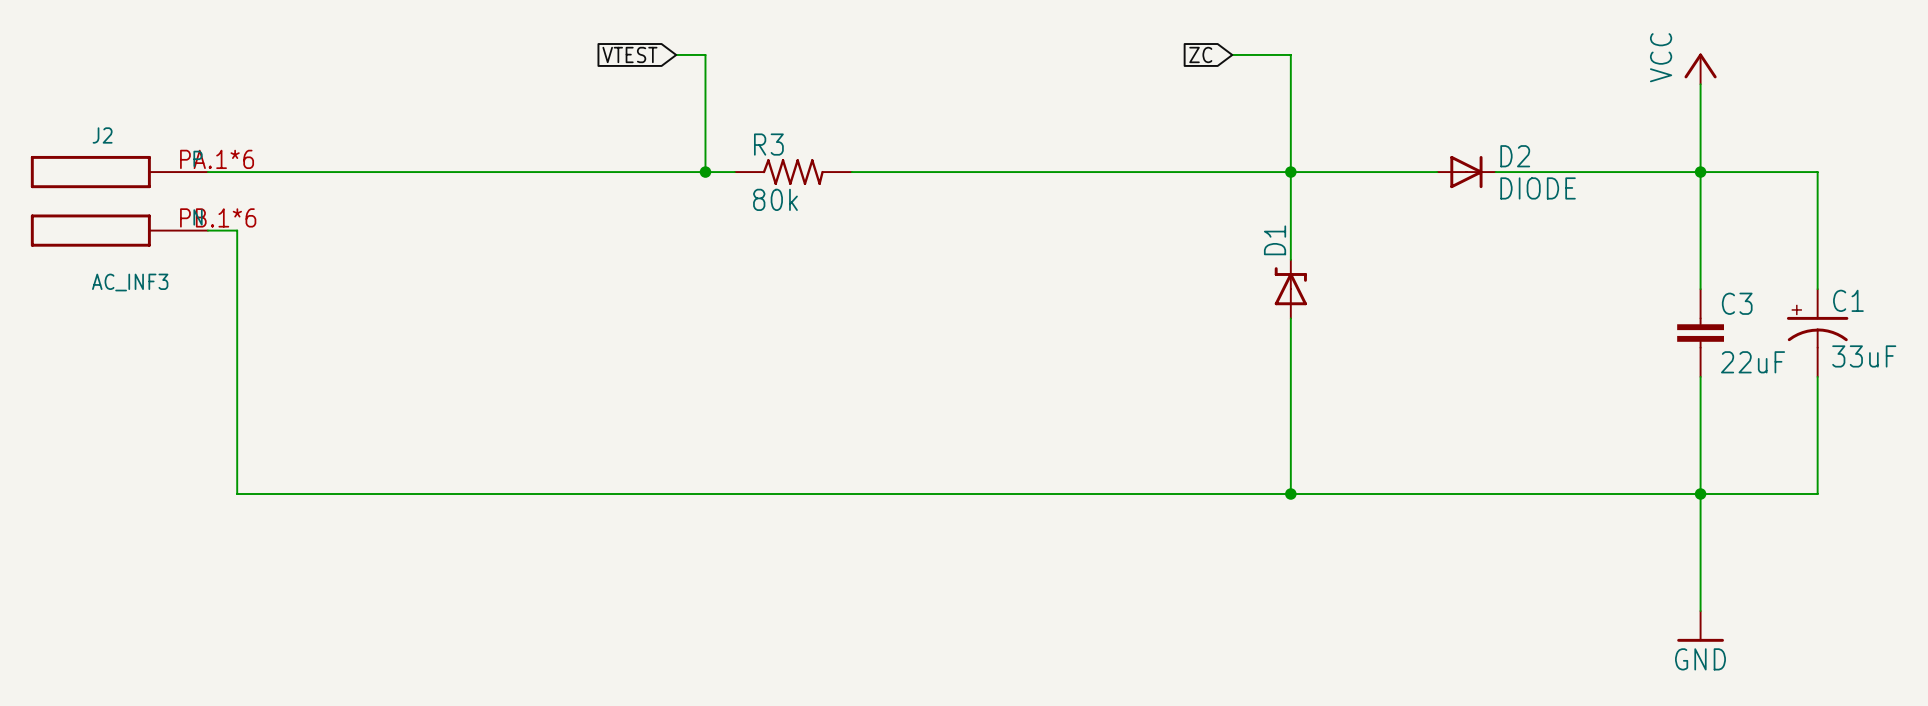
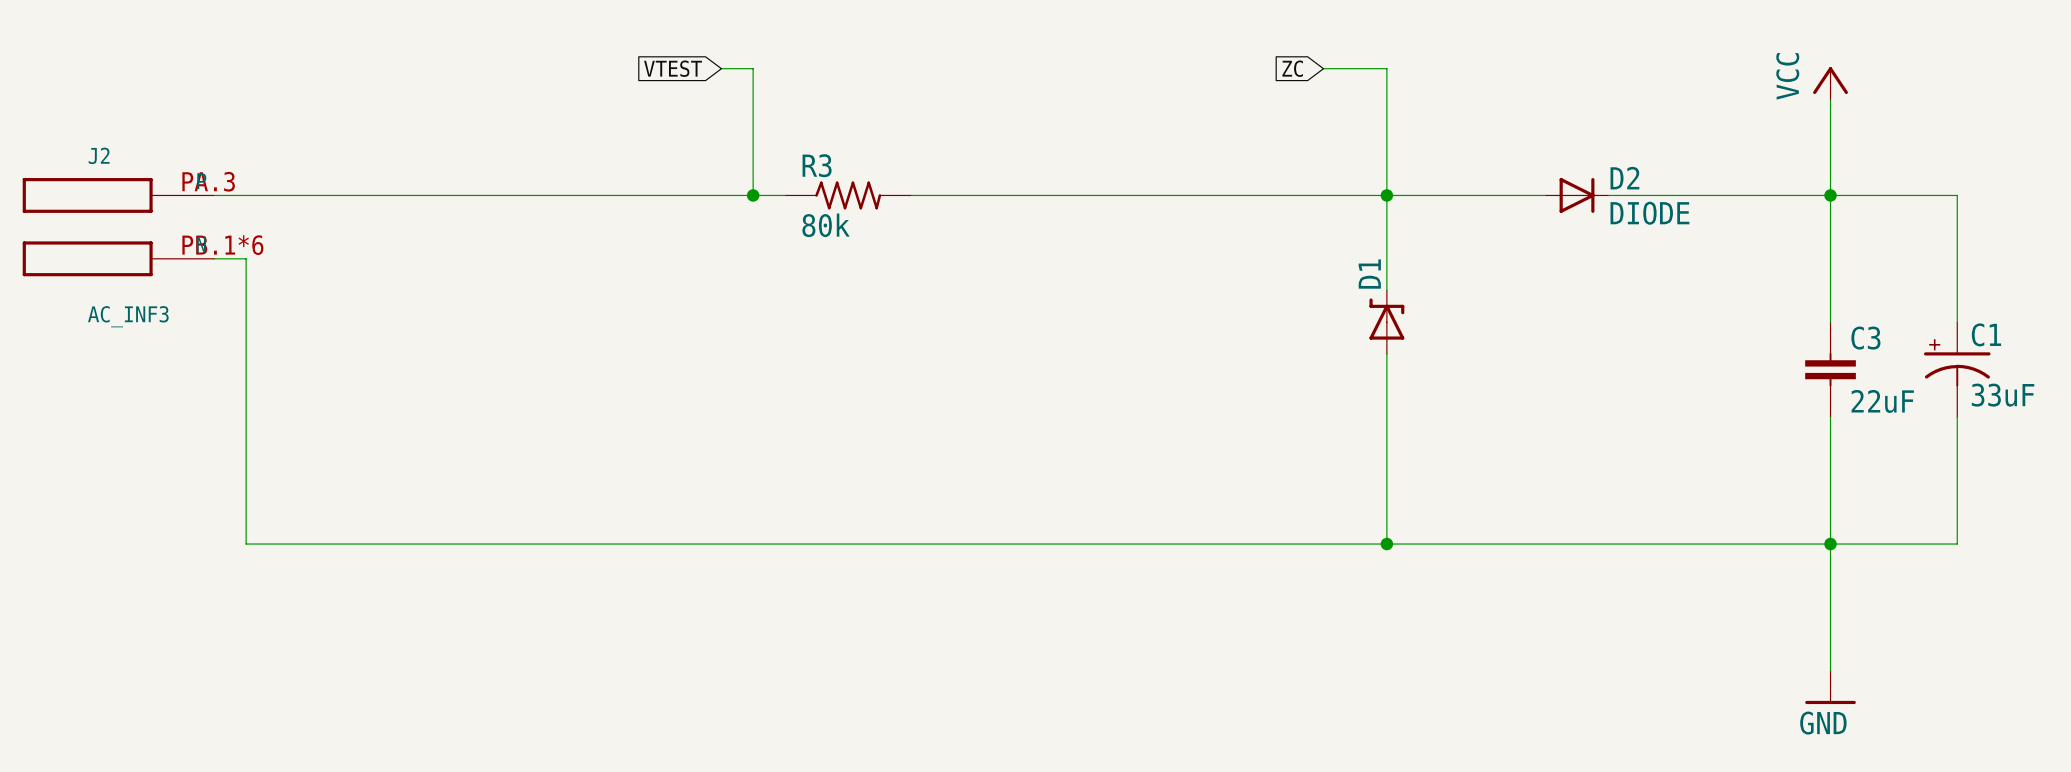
J2 pin number: PA.1*6 (217, 159) -> PA.3 (208, 181)

